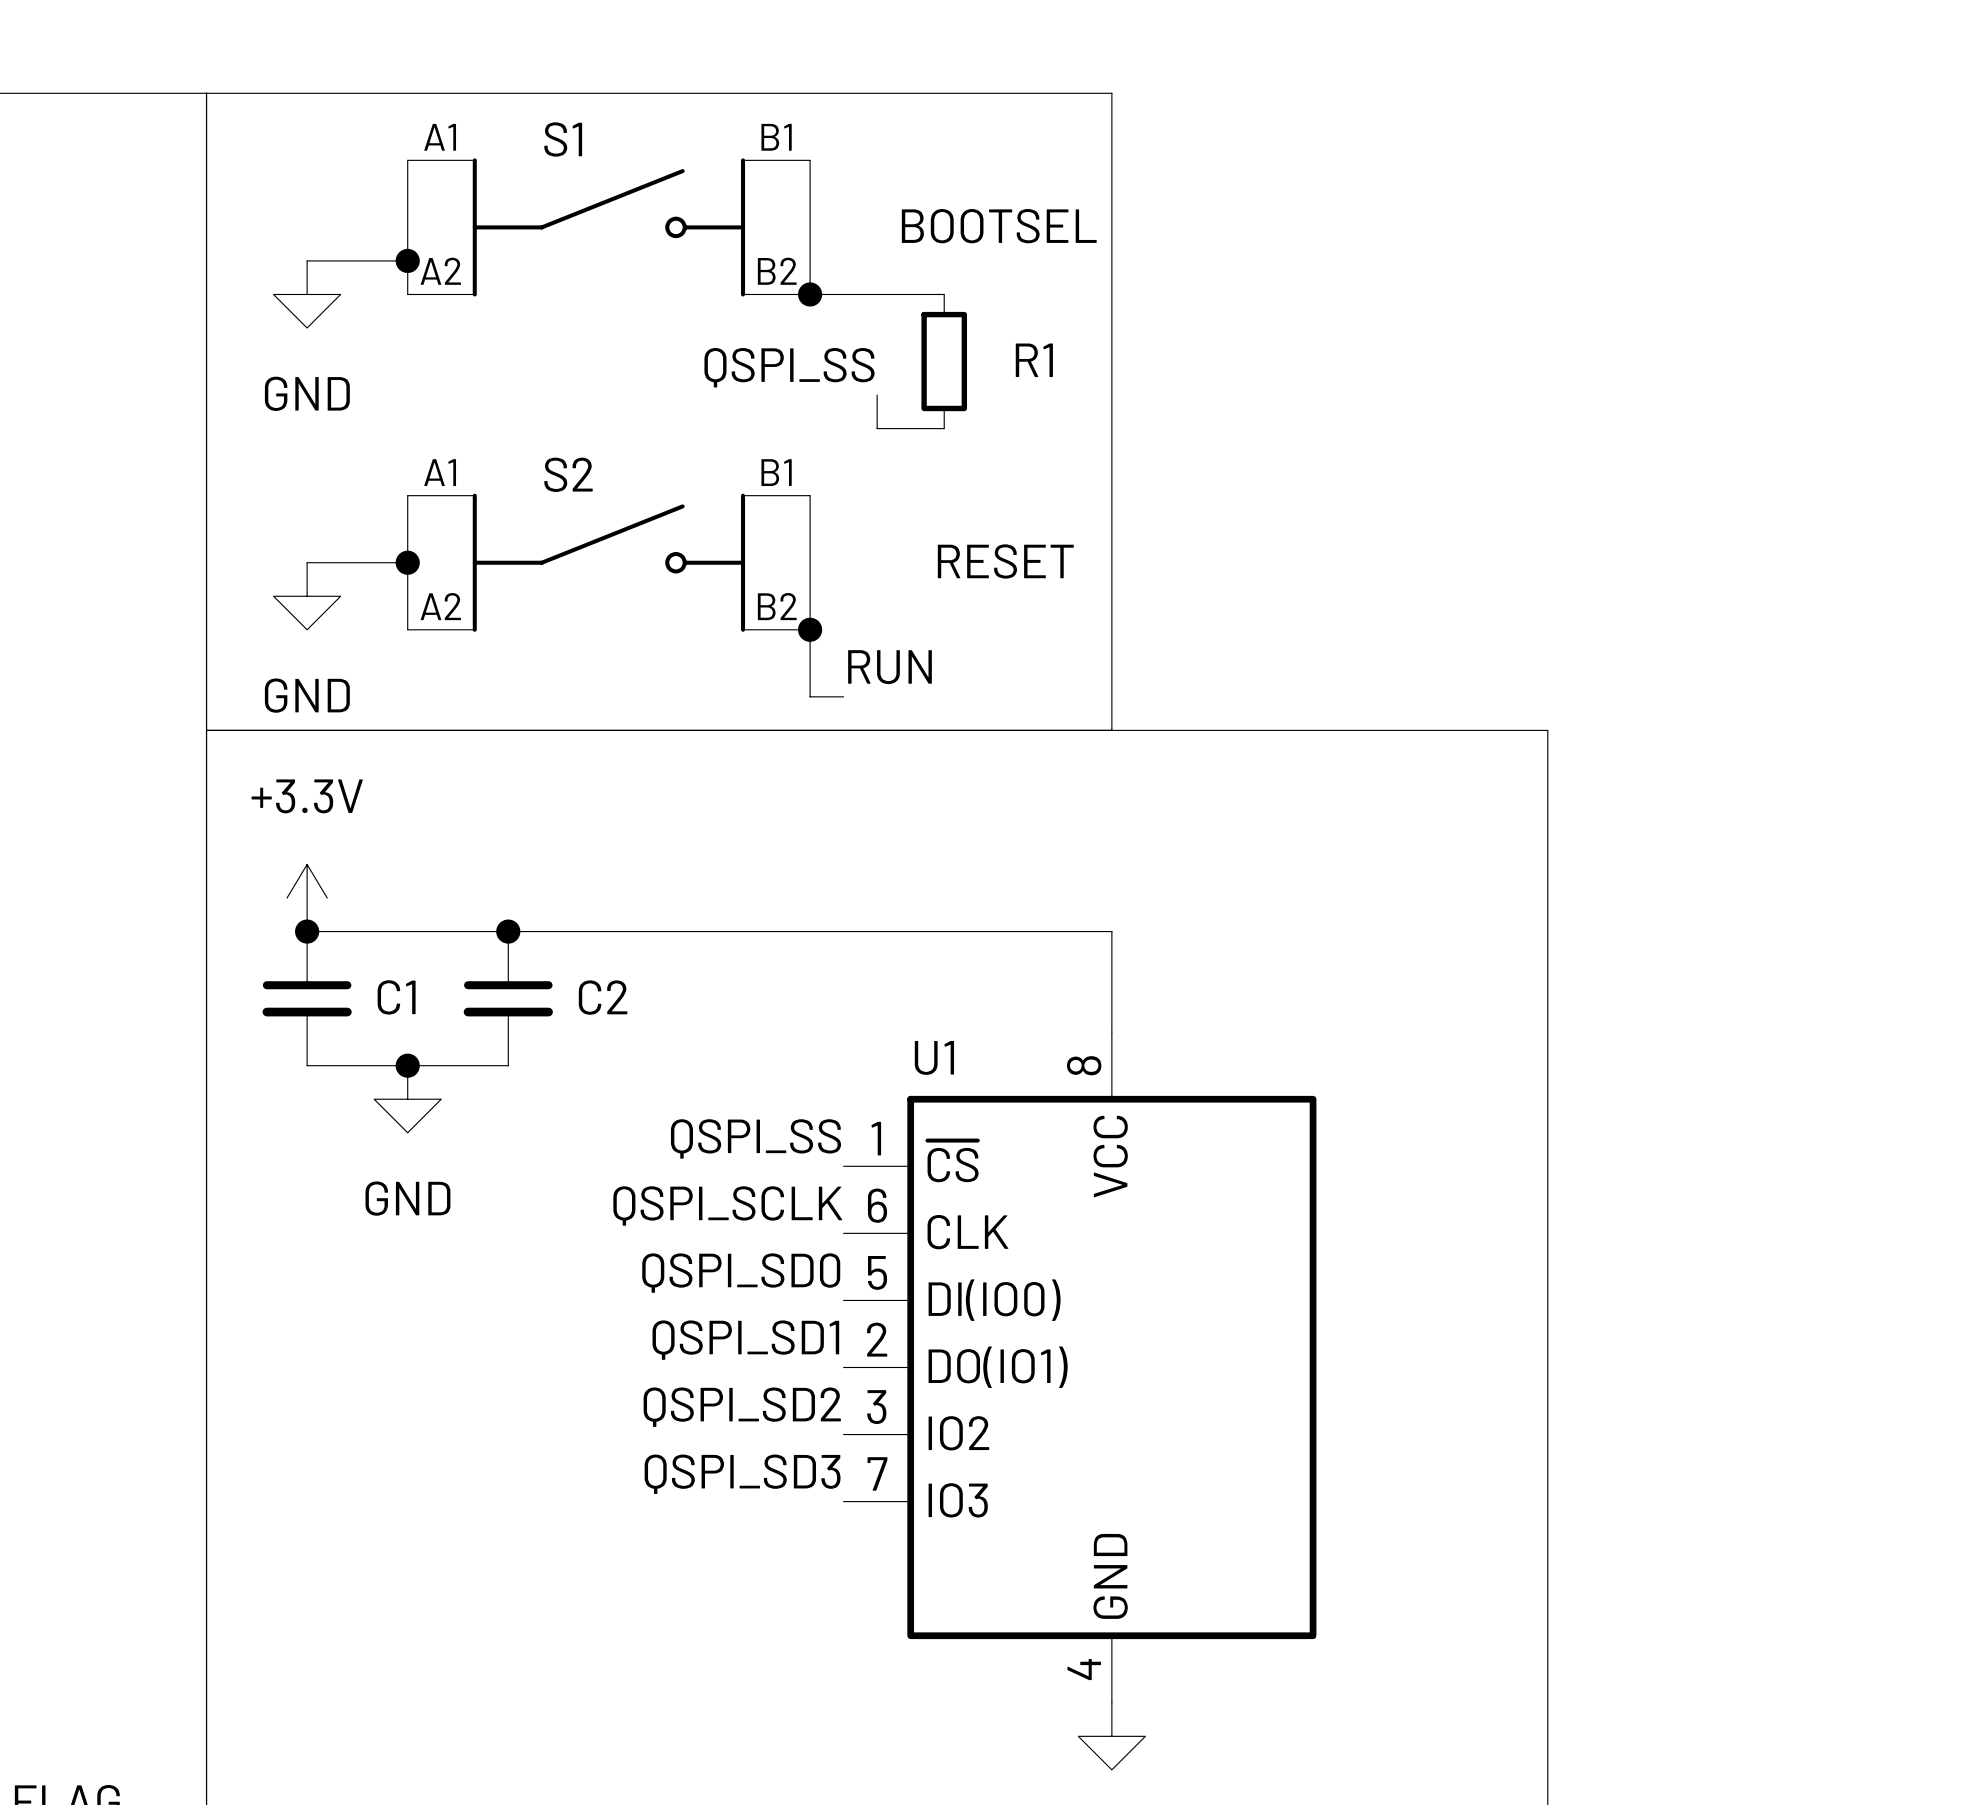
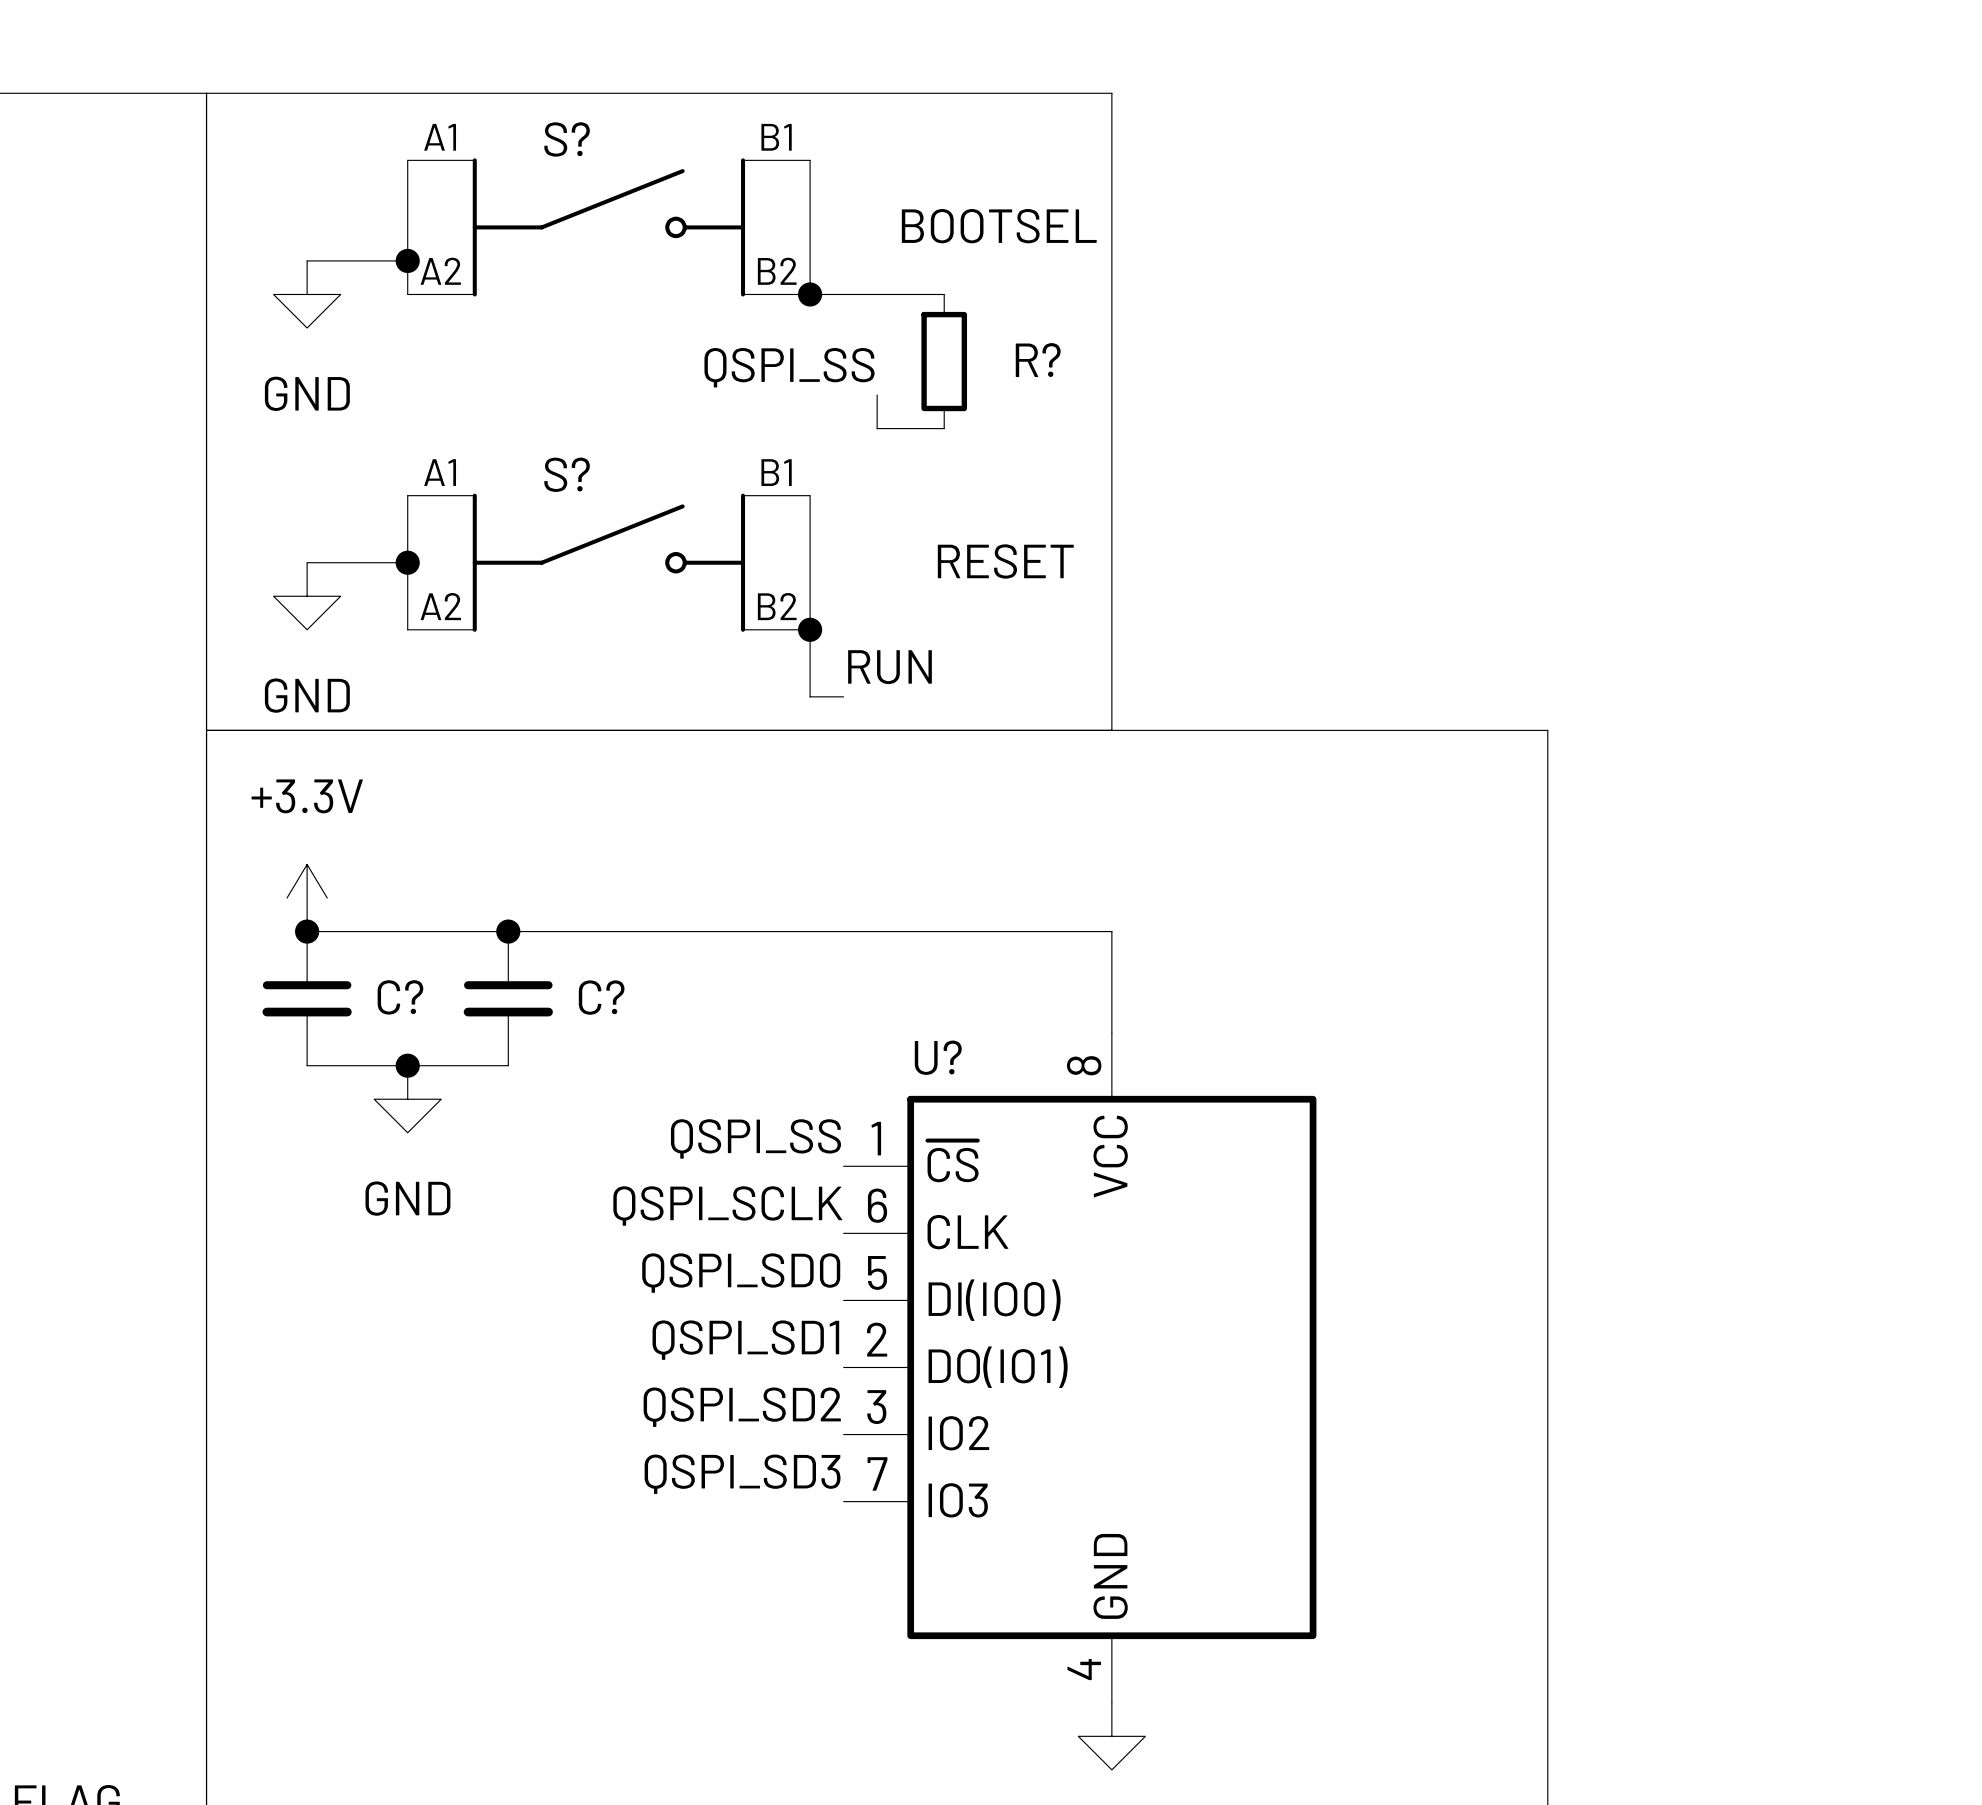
S1 name: S1 (563, 139) -> S? (567, 139)
R1 name: R1 (1034, 360) -> R? (1038, 360)
S2 name: S2 (568, 474) -> S? (567, 474)
C1 name: C1 (396, 997) -> C? (400, 997)
C2 name: C2 (603, 997) -> C? (601, 997)
U1 name: U1 (934, 1057) -> U? (938, 1057)

